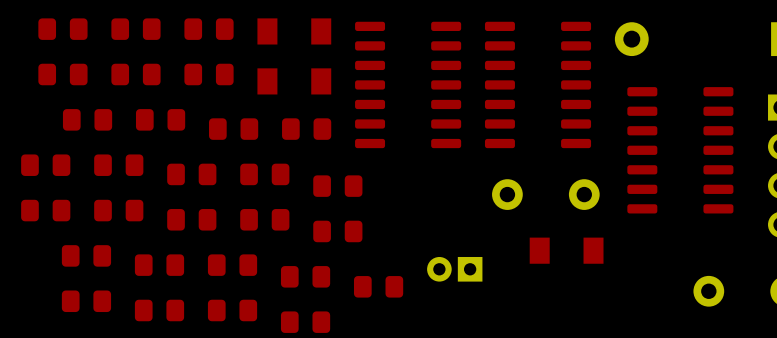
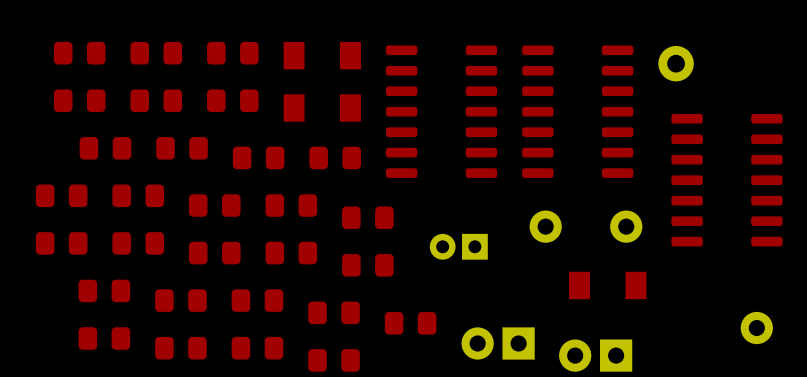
part position: (454, 269) -> (458, 246)
part: none -> (498, 343)
part: none -> (595, 355)

